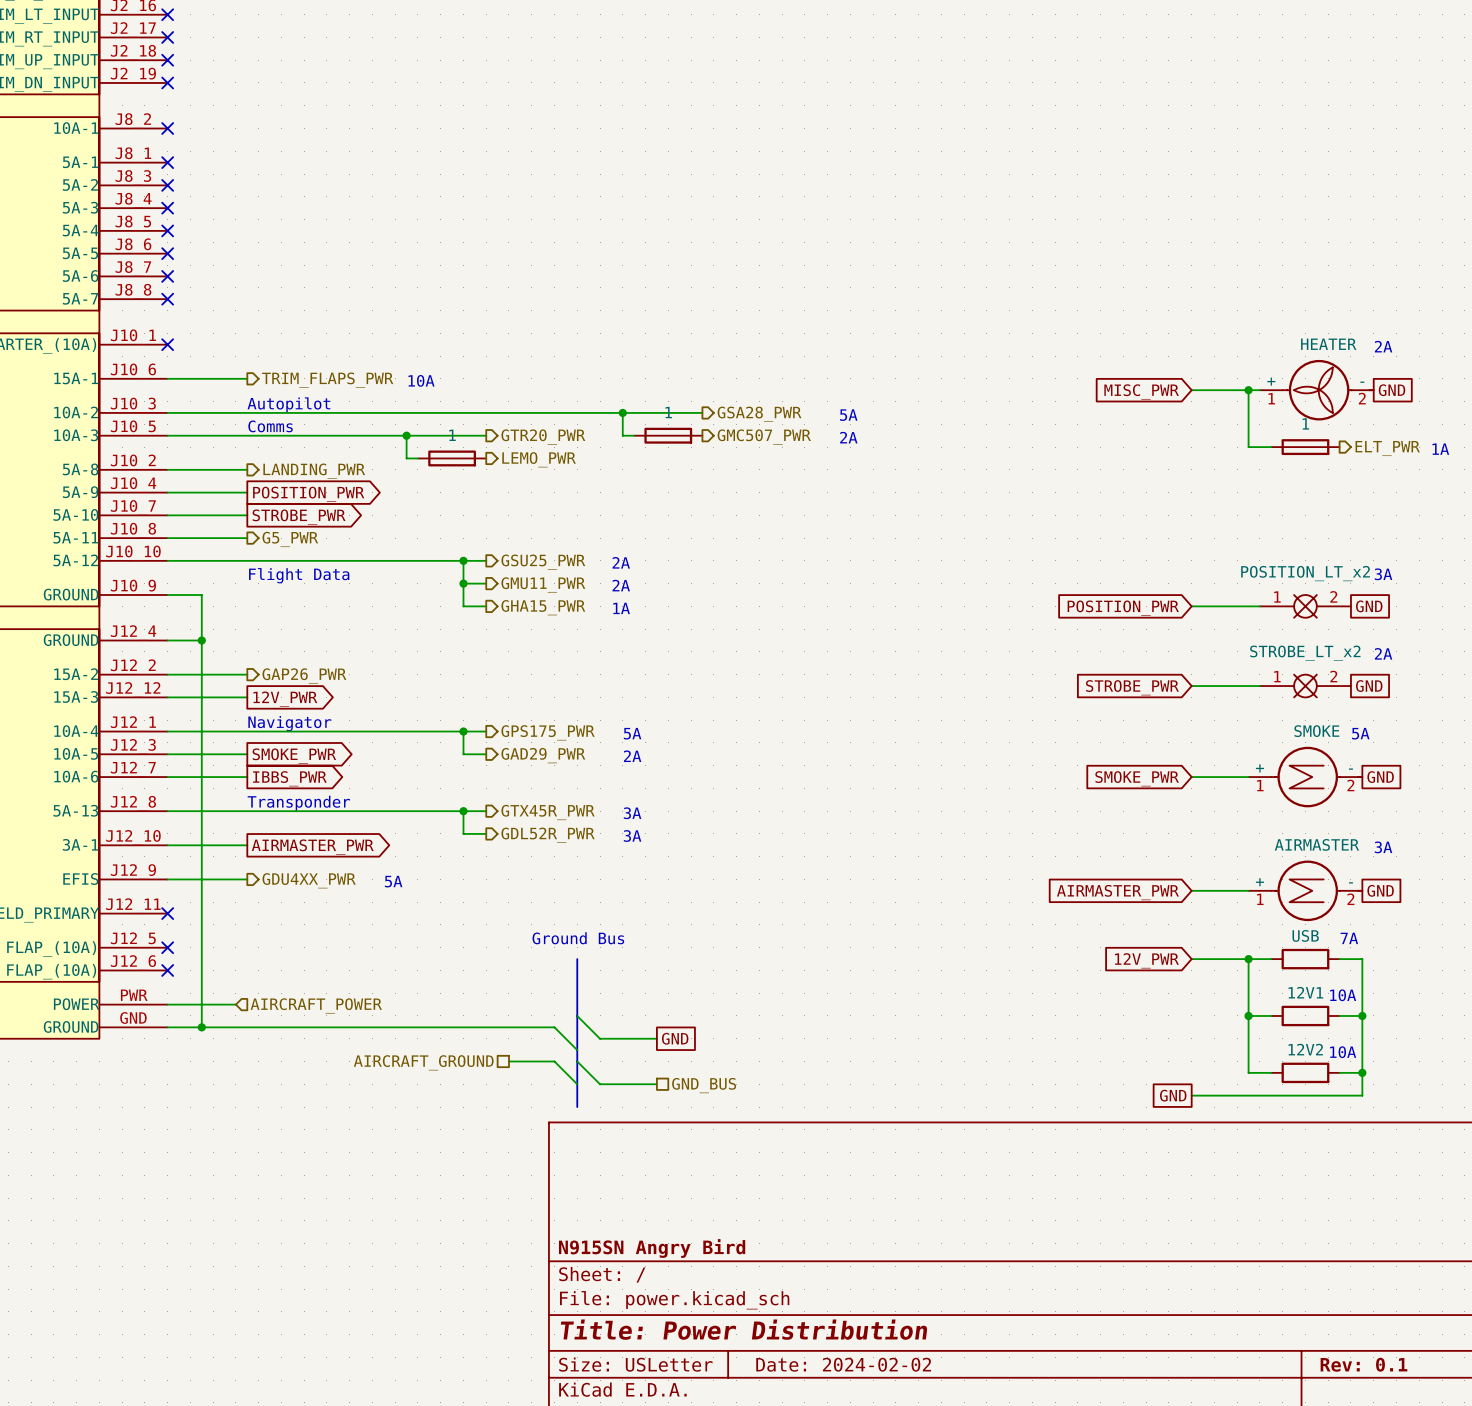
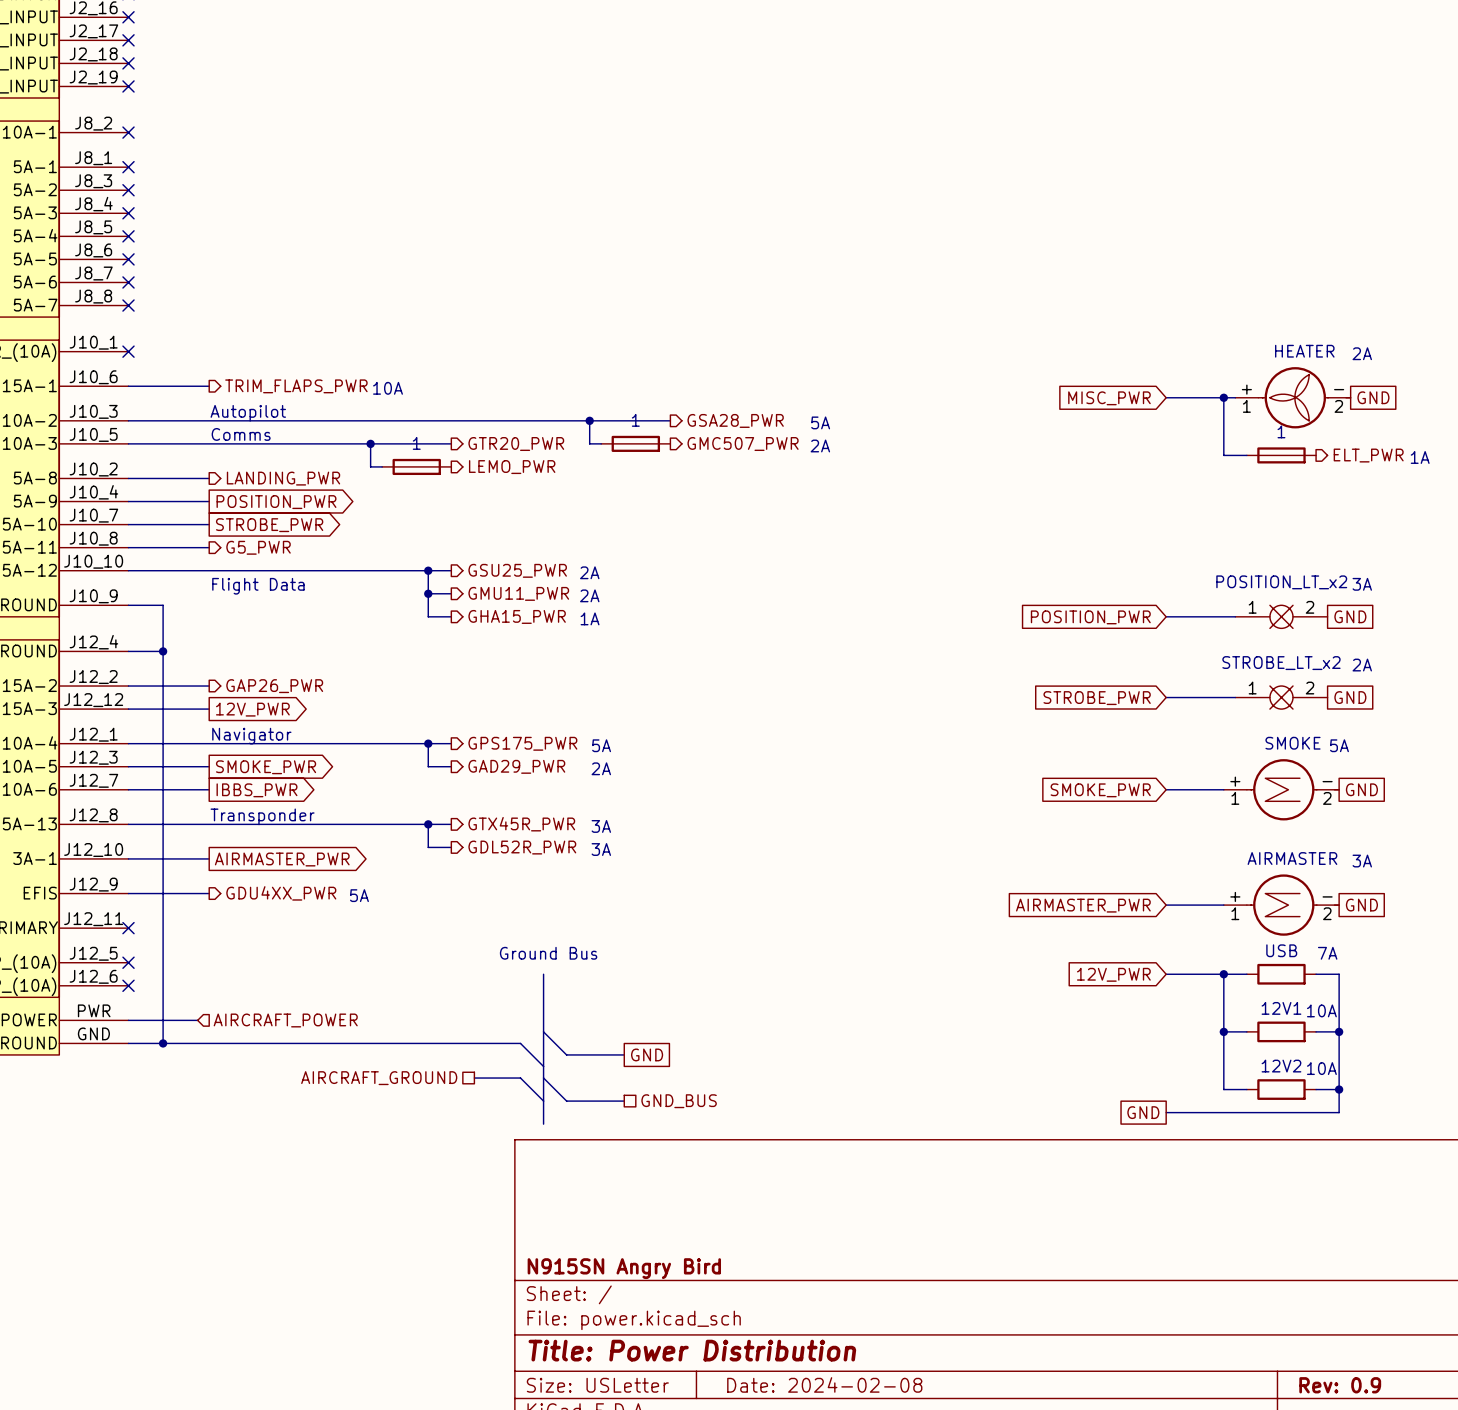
title block: Date: 2024-02-02 (843, 1364) -> Date: 2024-02-08 (824, 1384)
title block: Rev: 0.1 (1363, 1364) -> Rev: 0.9 (1340, 1385)

